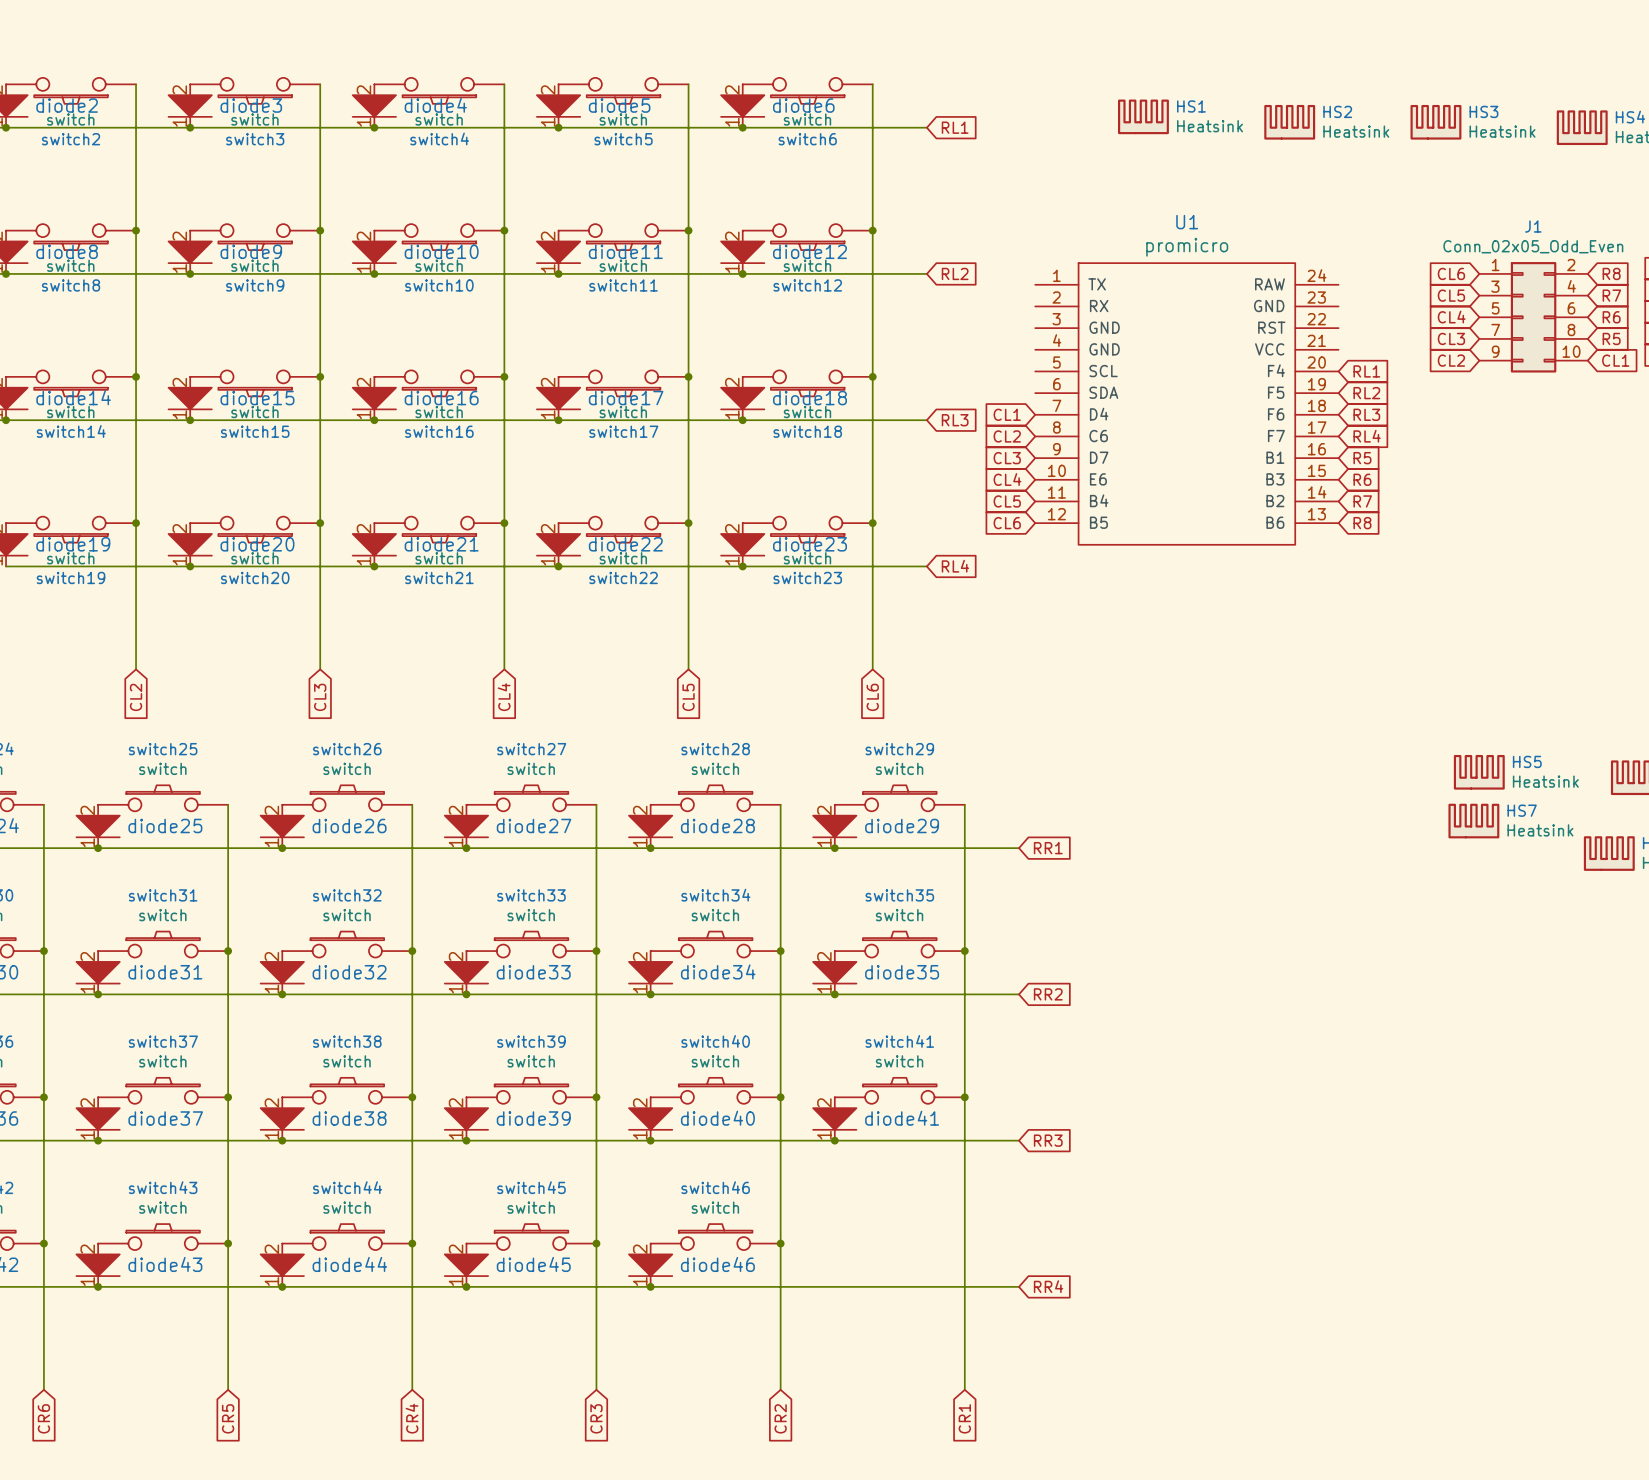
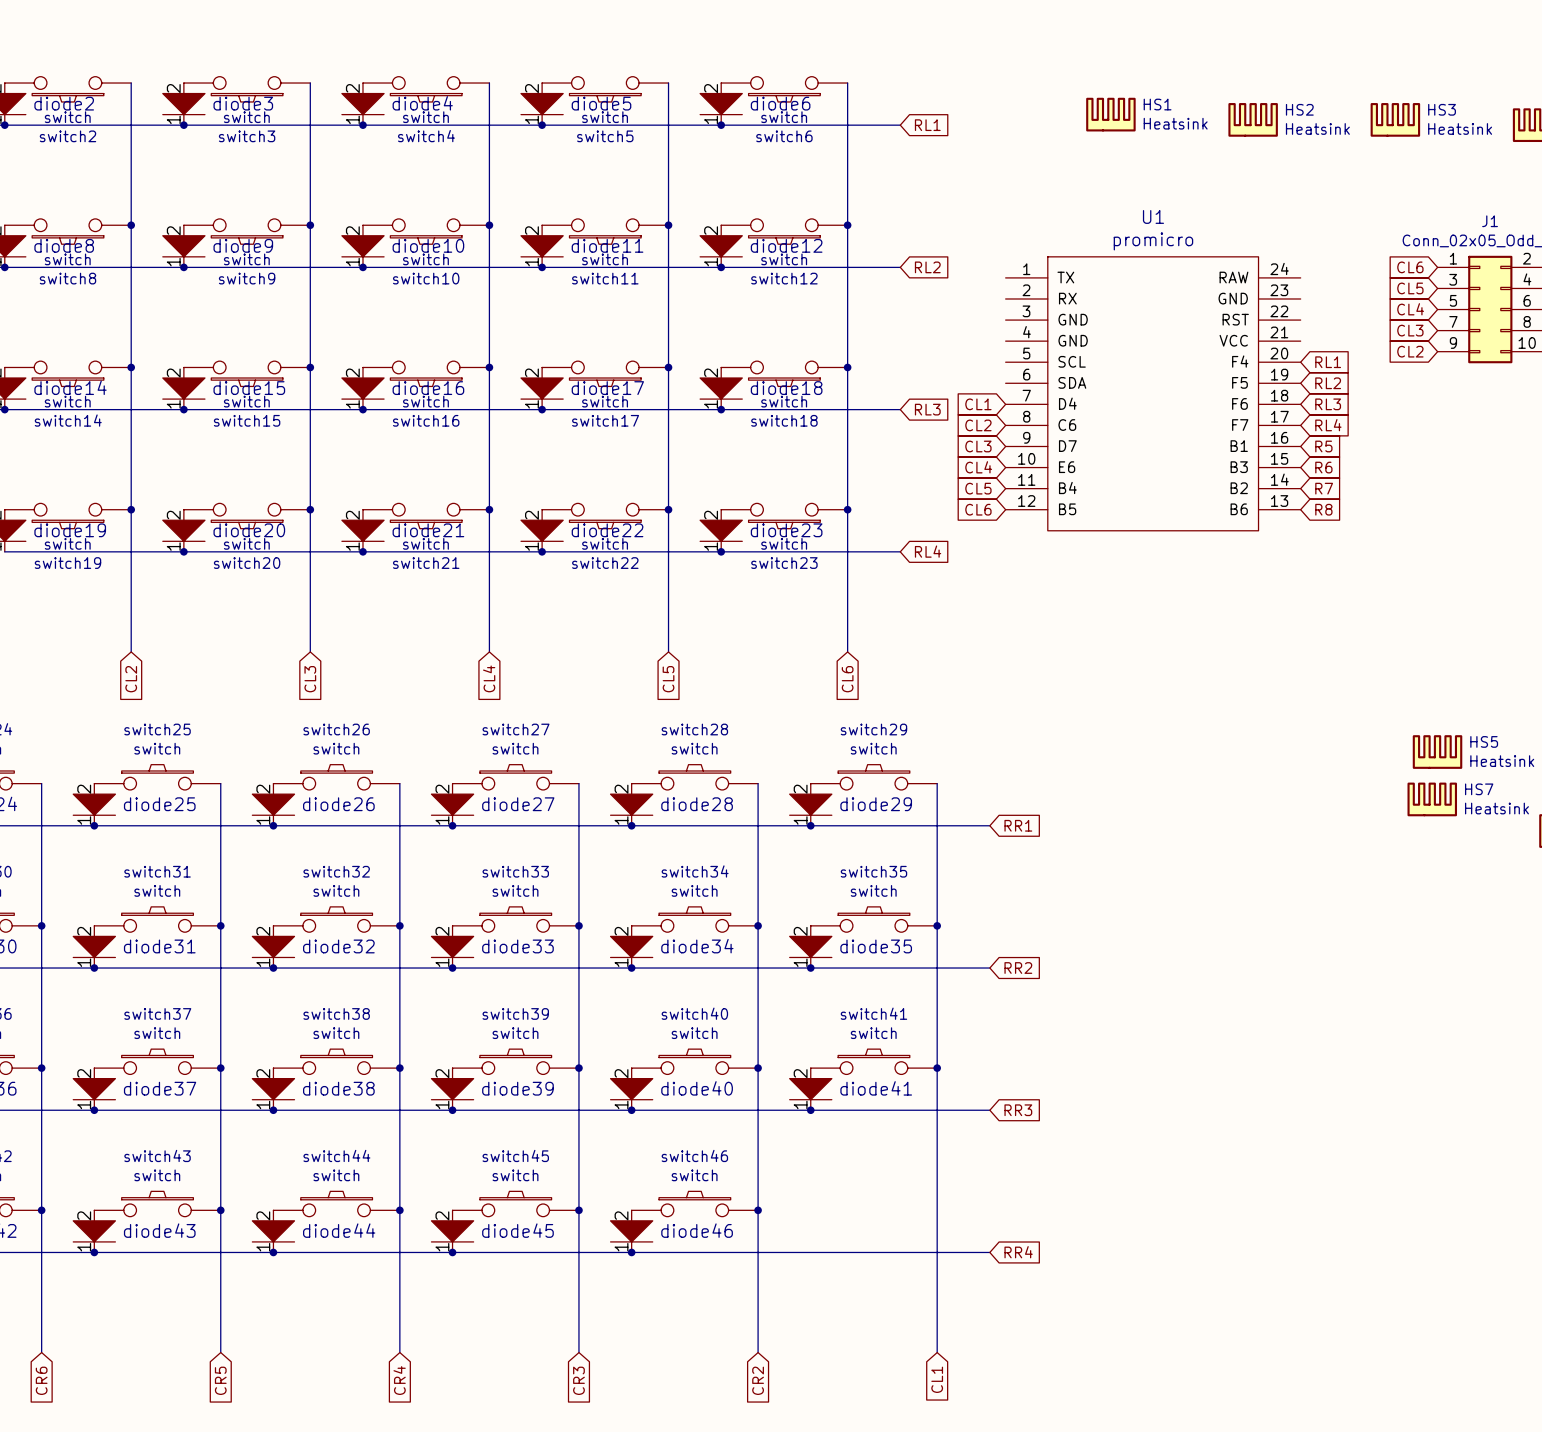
global label: CR1 (964, 1418) -> CL1 (937, 1379)

